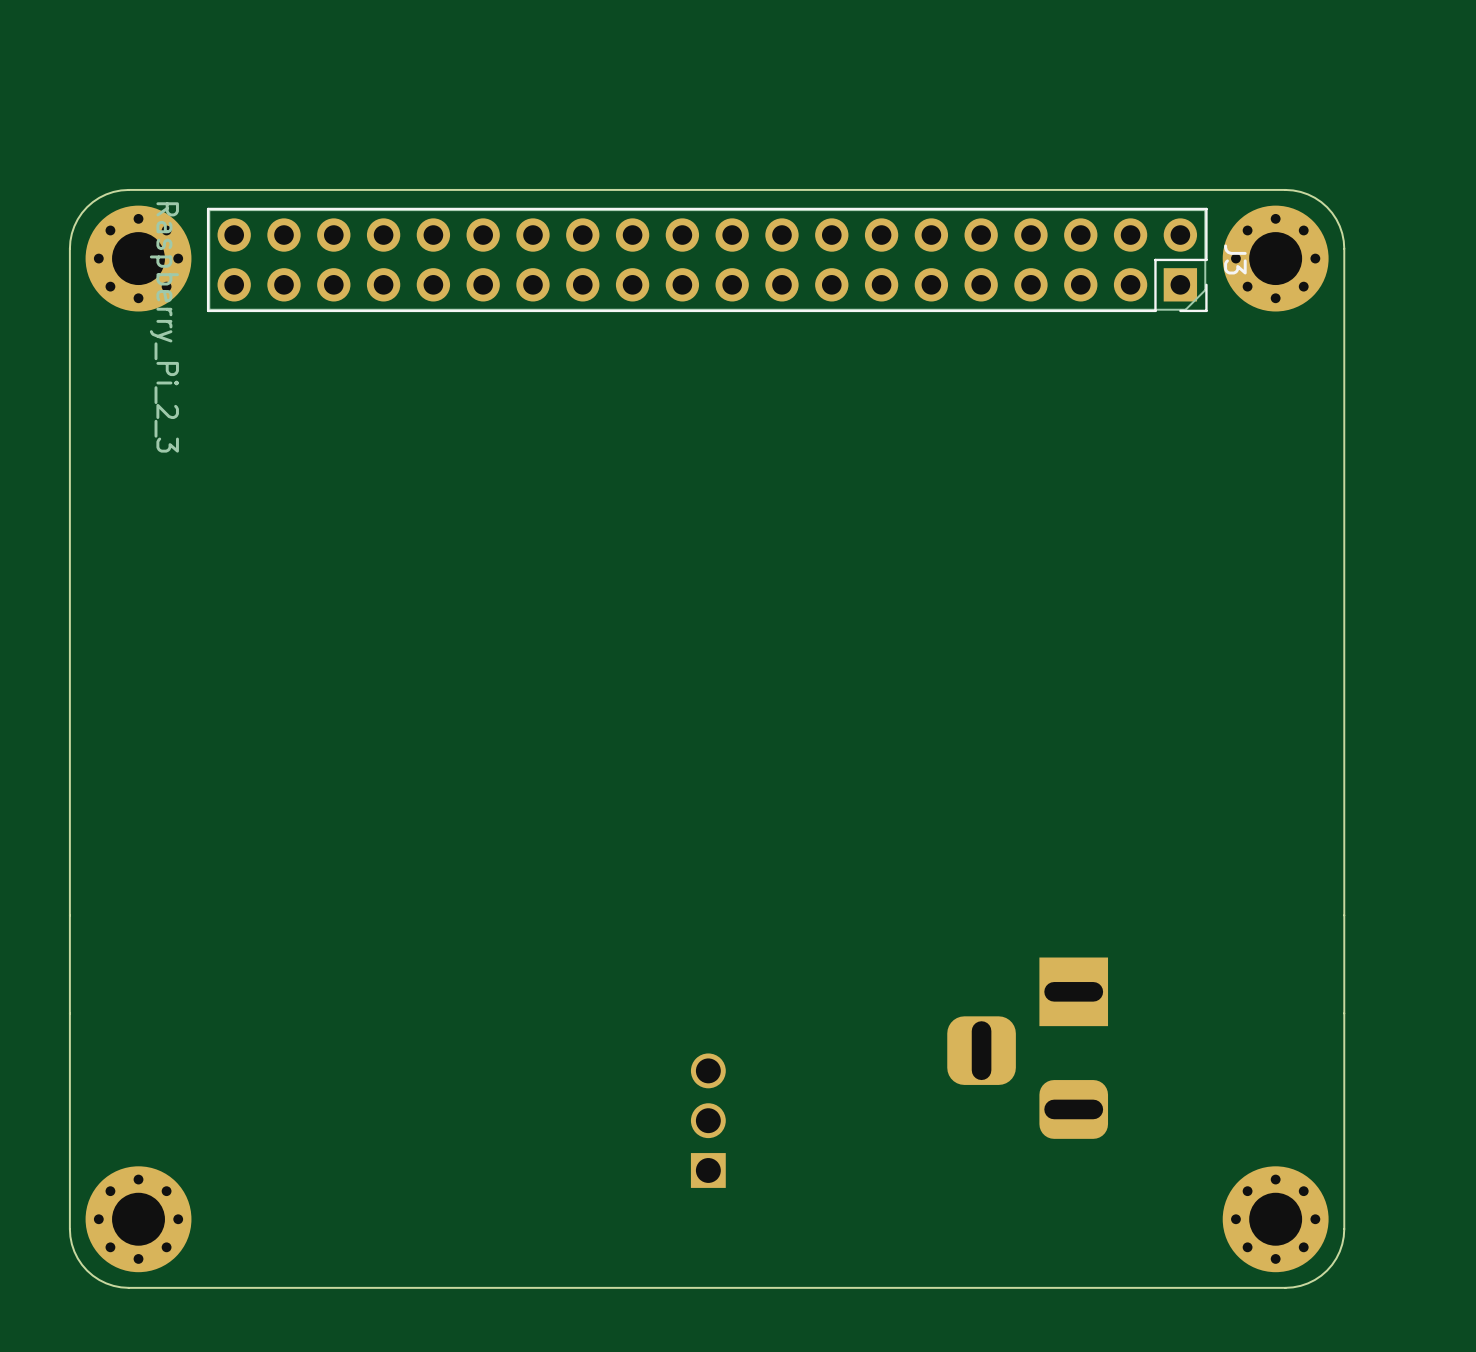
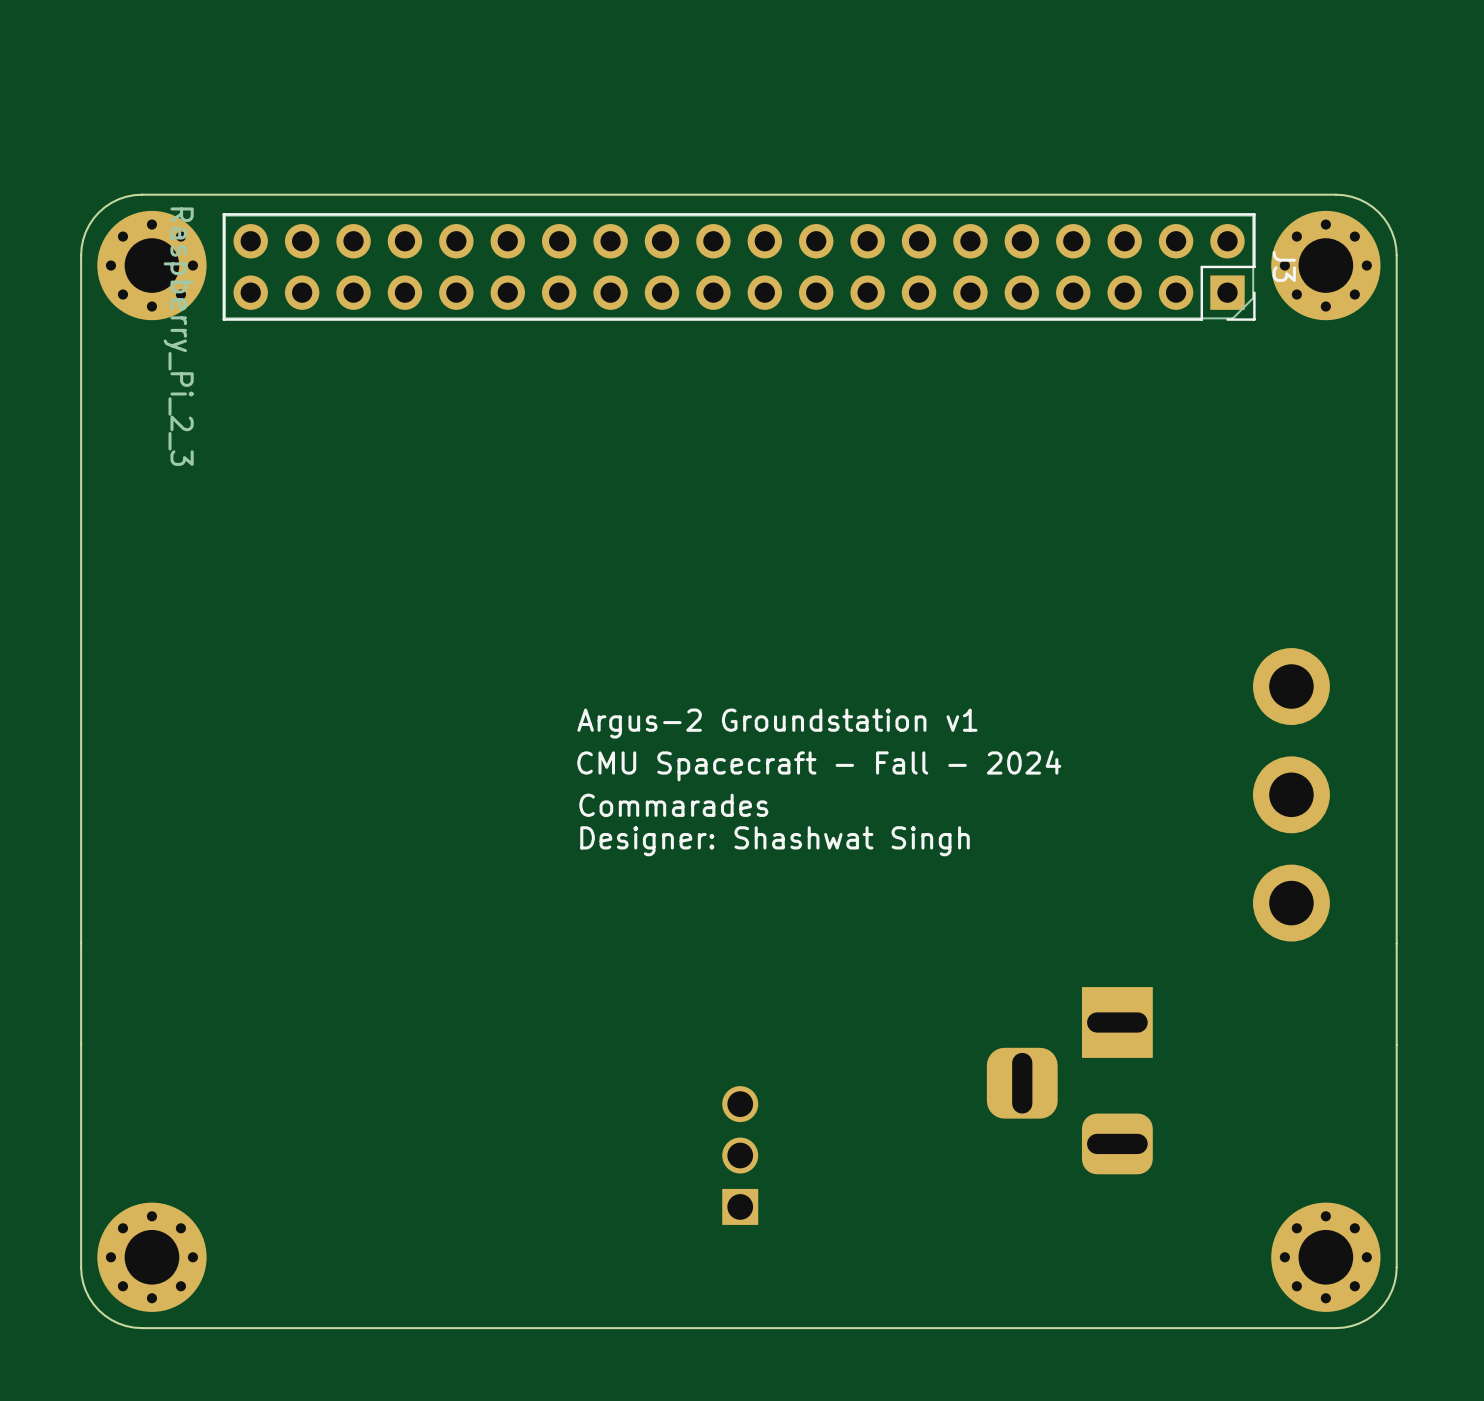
part: none -> (1291, 686)
text: none -> Argus-2 Groundstation v1 (777, 723)
text: none -> CMU Spacecraft - Fall - 2024 (819, 765)
part: none -> (1291, 794)
text: none -> Commarades (673, 805)
text: none -> Designer: Shashwat Singh (775, 841)
part: none -> (1291, 903)

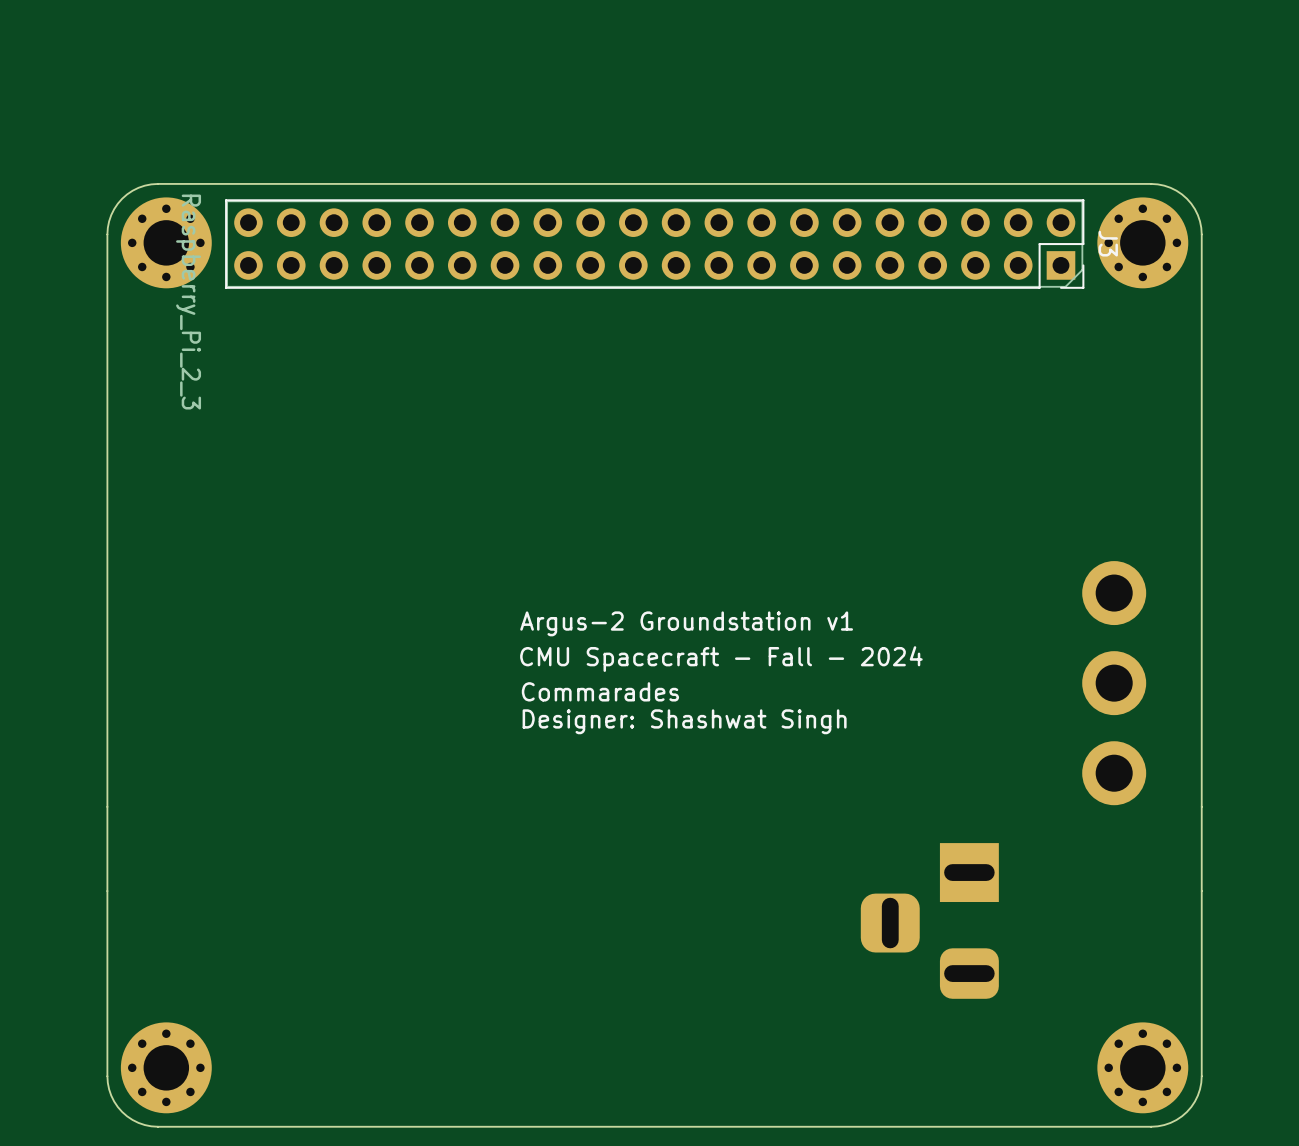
part: (740, 1155) -> none

